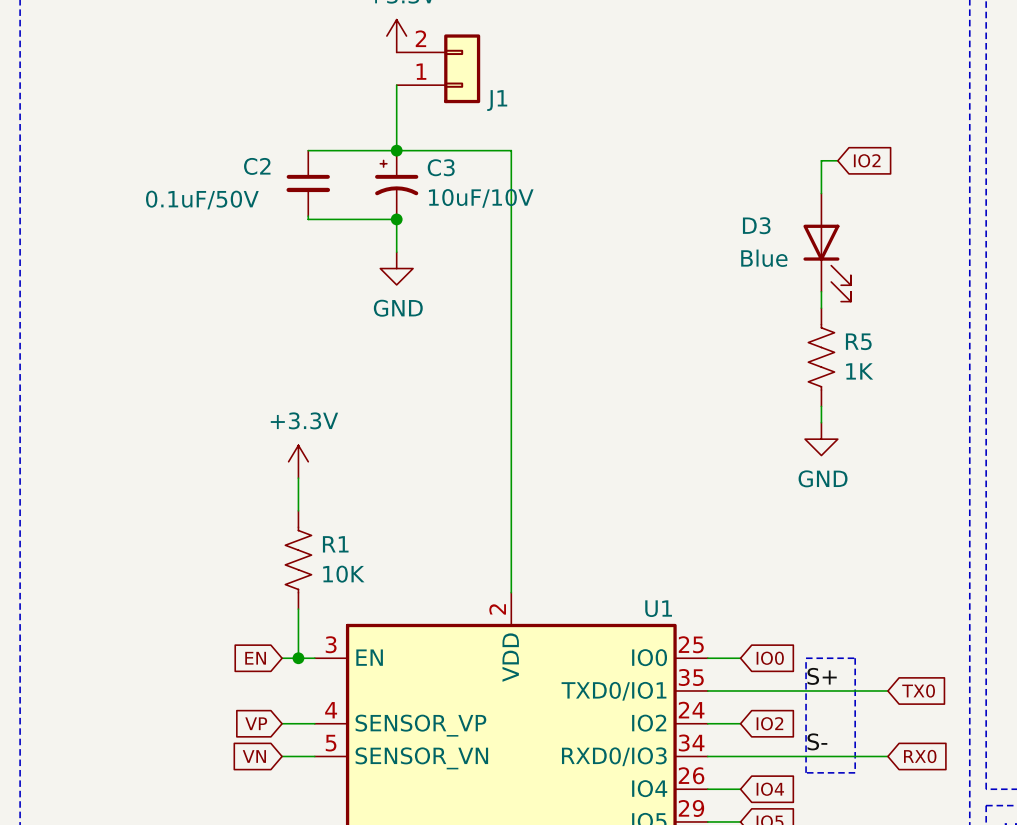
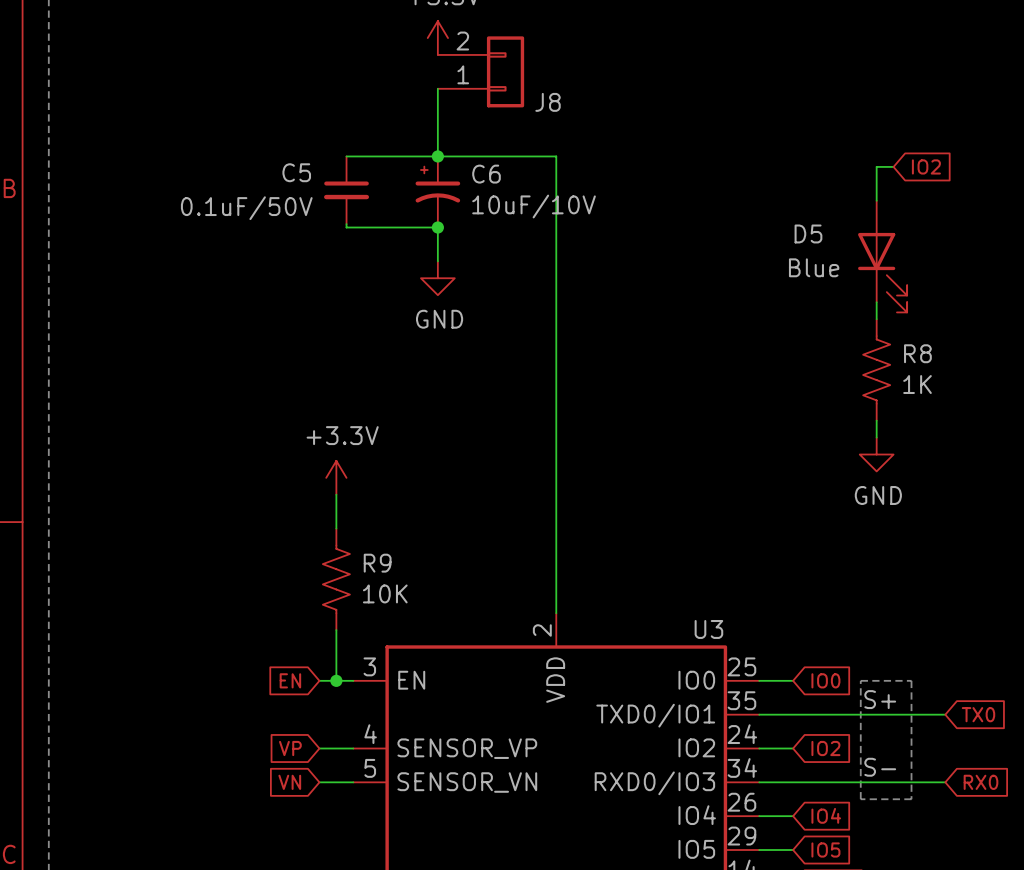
J1 name: J1 (497, 100) -> J8 (548, 102)
C2 name: C2 (257, 166) -> C5 (296, 172)
C3 name: C3 (441, 167) -> C6 (486, 174)
D3 name: D3 (756, 225) -> D5 (808, 233)
R5 name: R5 (858, 341) -> R8 (917, 353)
R1 name: R1 (335, 544) -> R9 (377, 563)
U1 name: U1 (658, 608) -> U3 (708, 629)

